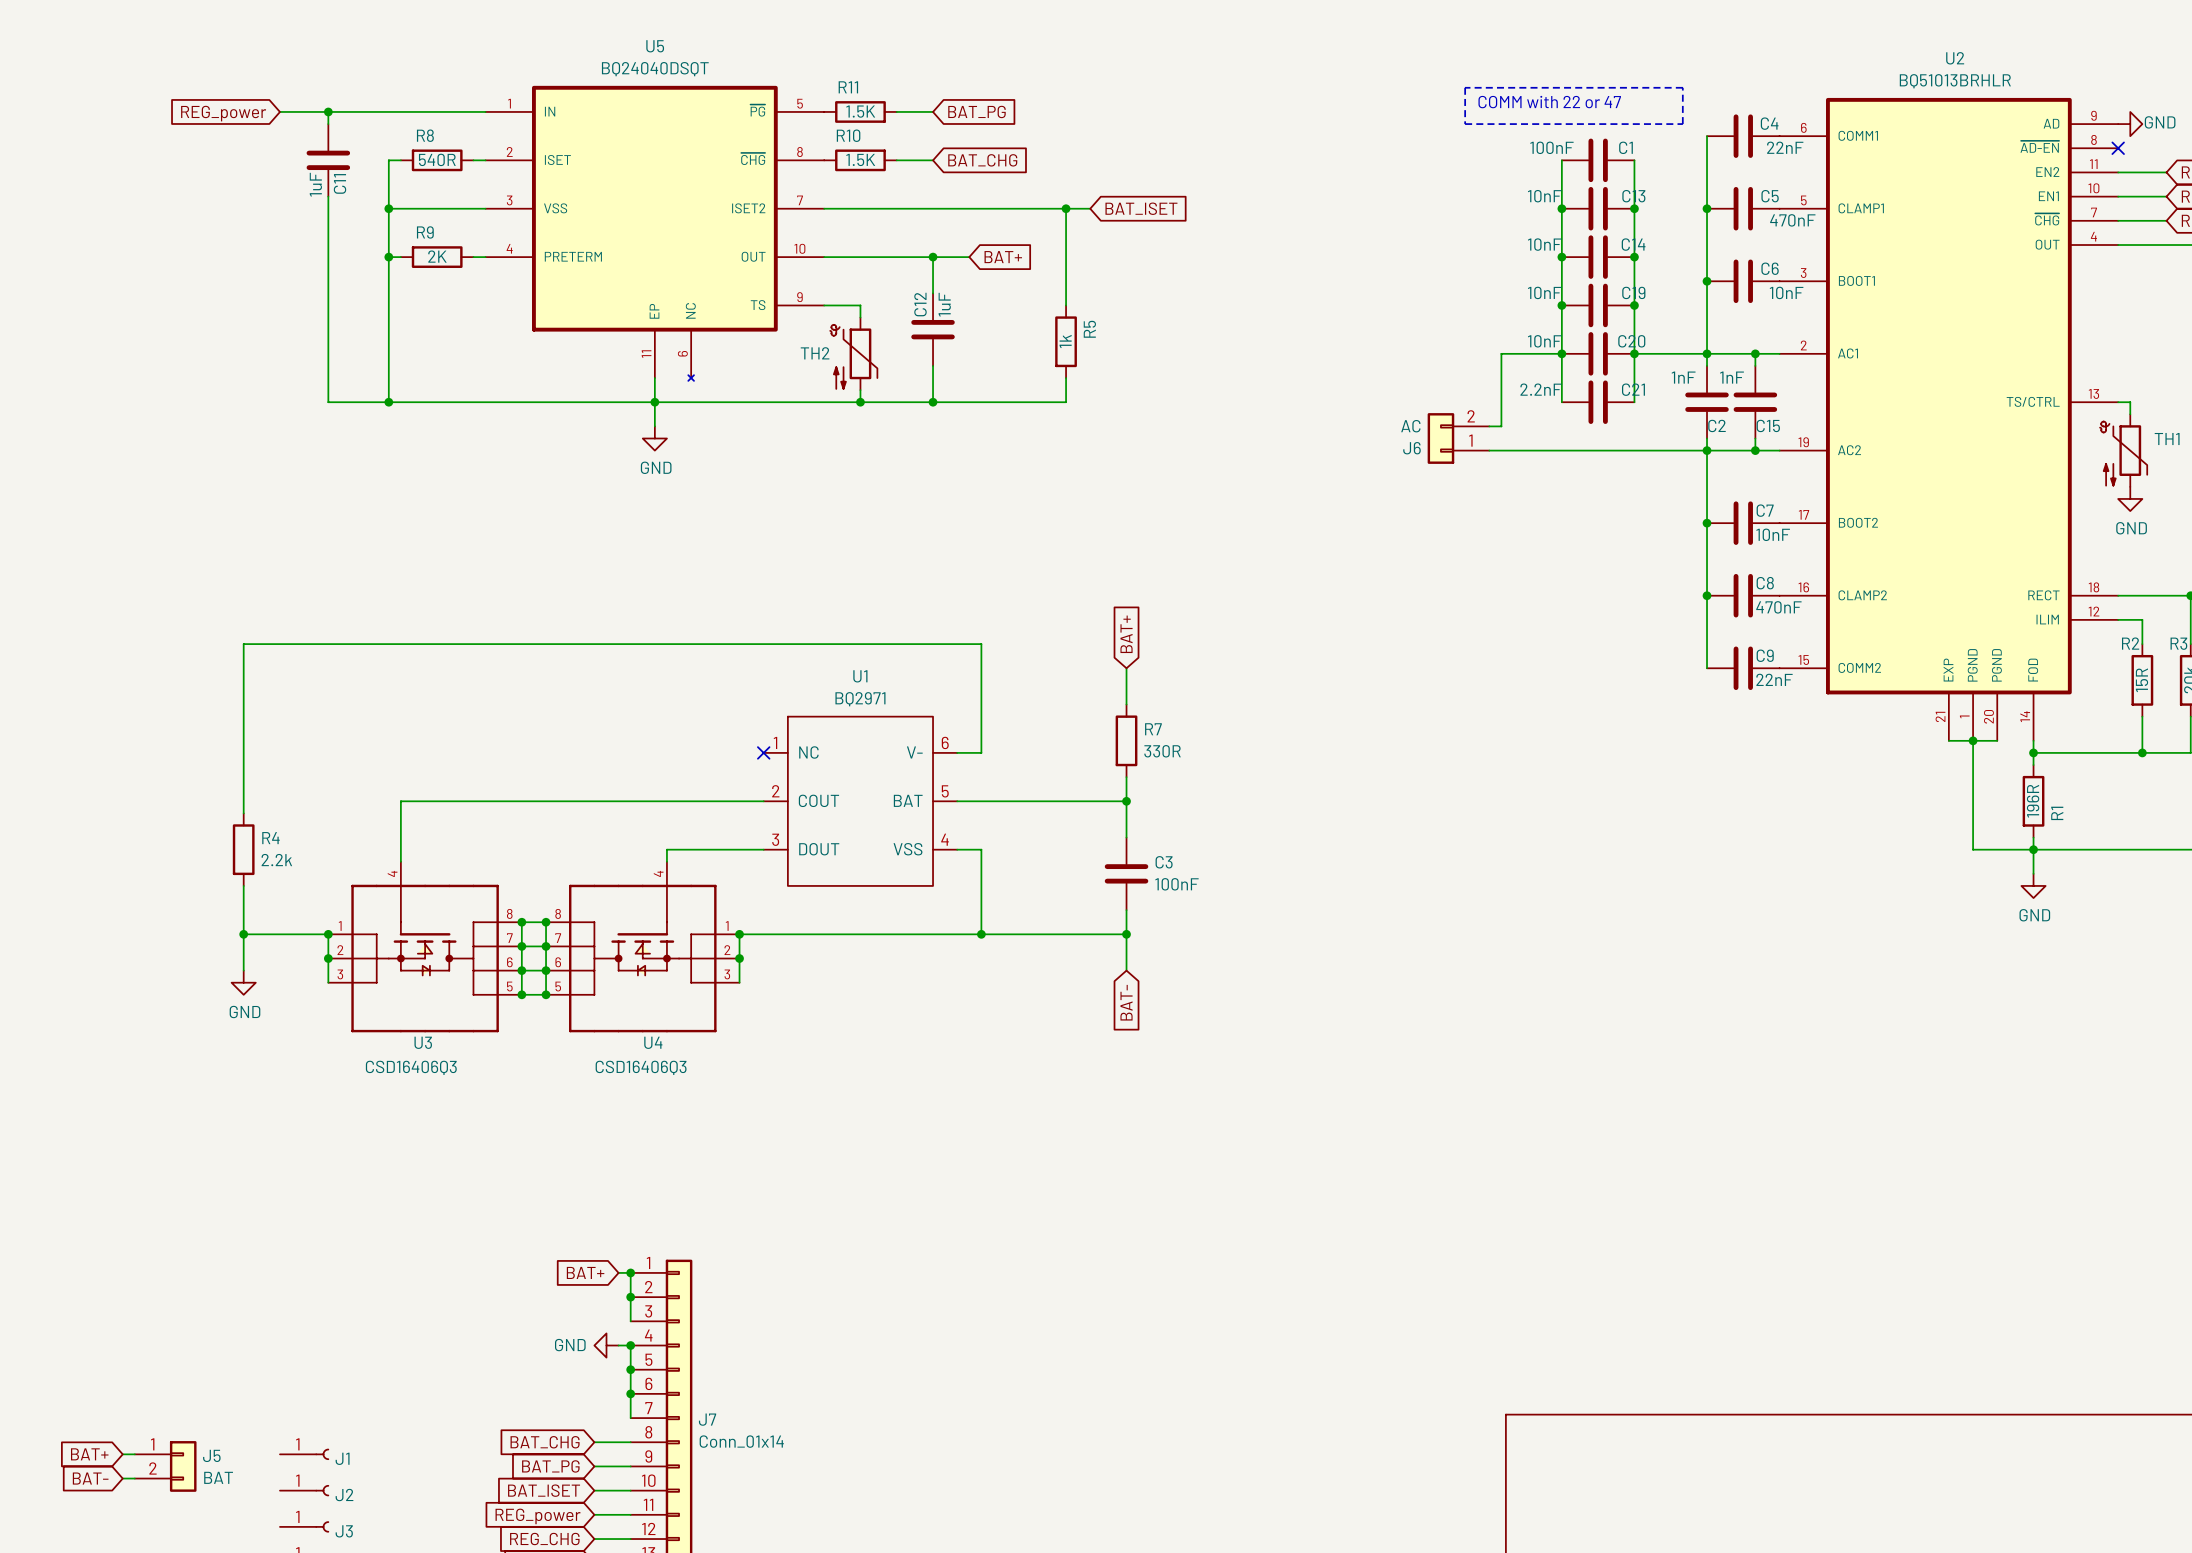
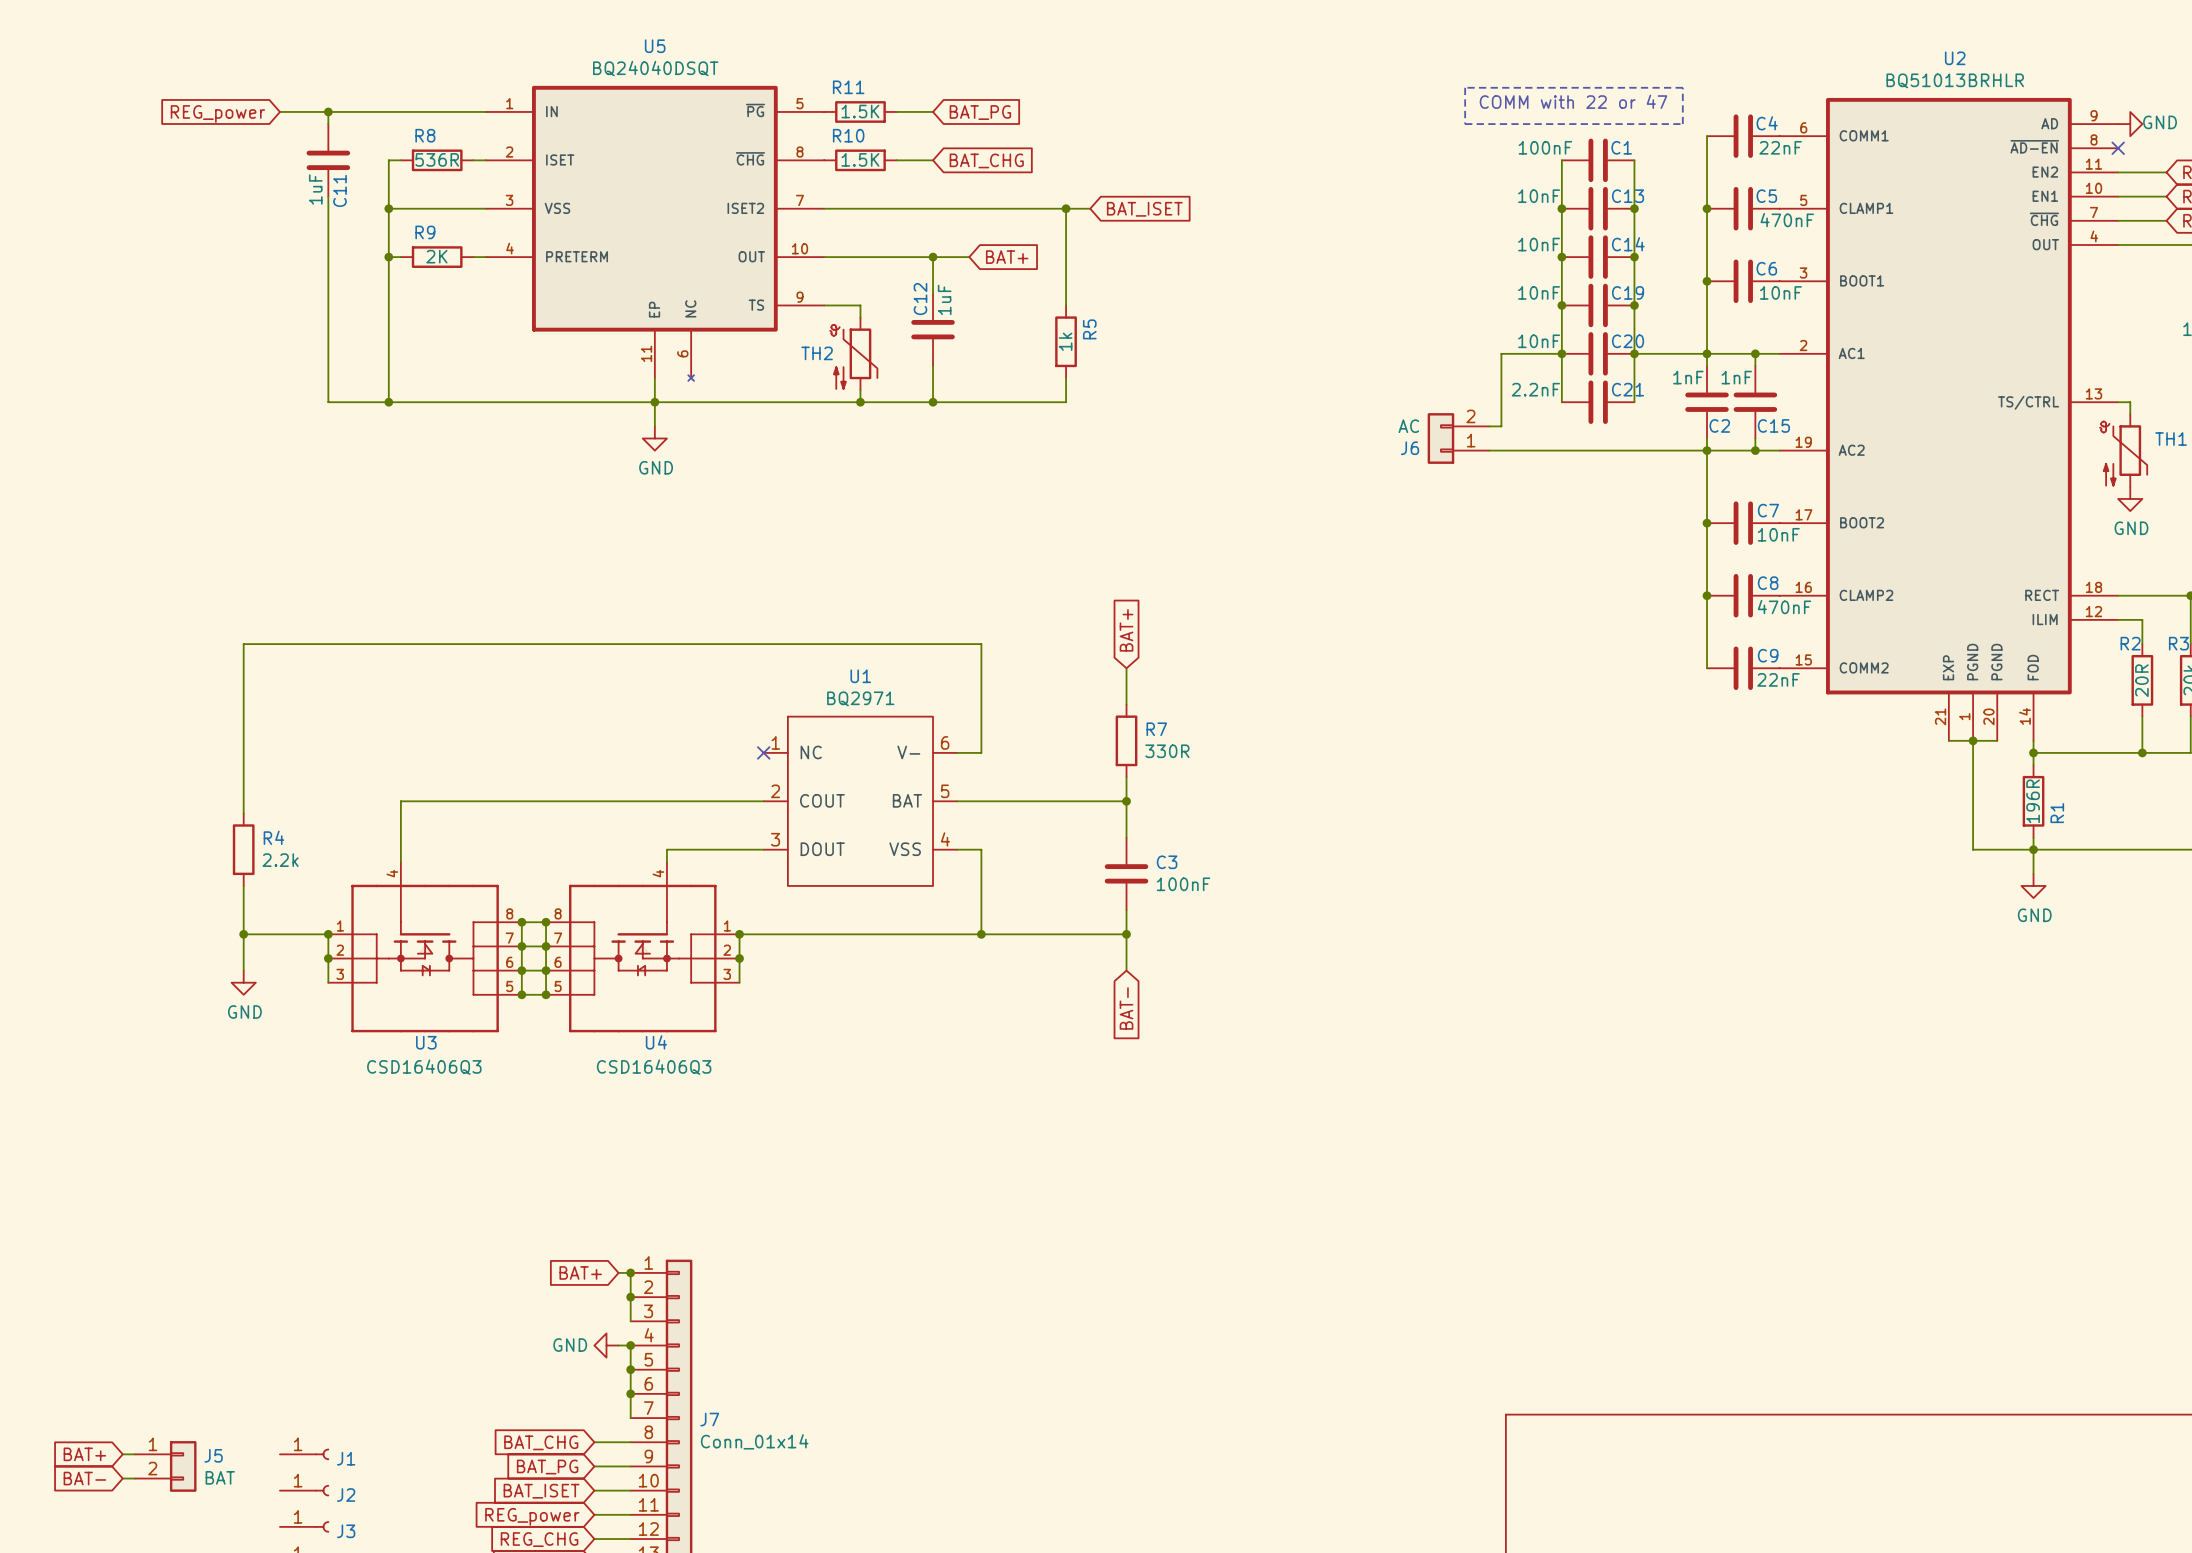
R8 value: 540R (437, 159) -> 536R (437, 159)
R2 value: 15R (2141, 680) -> 20R (2141, 680)

